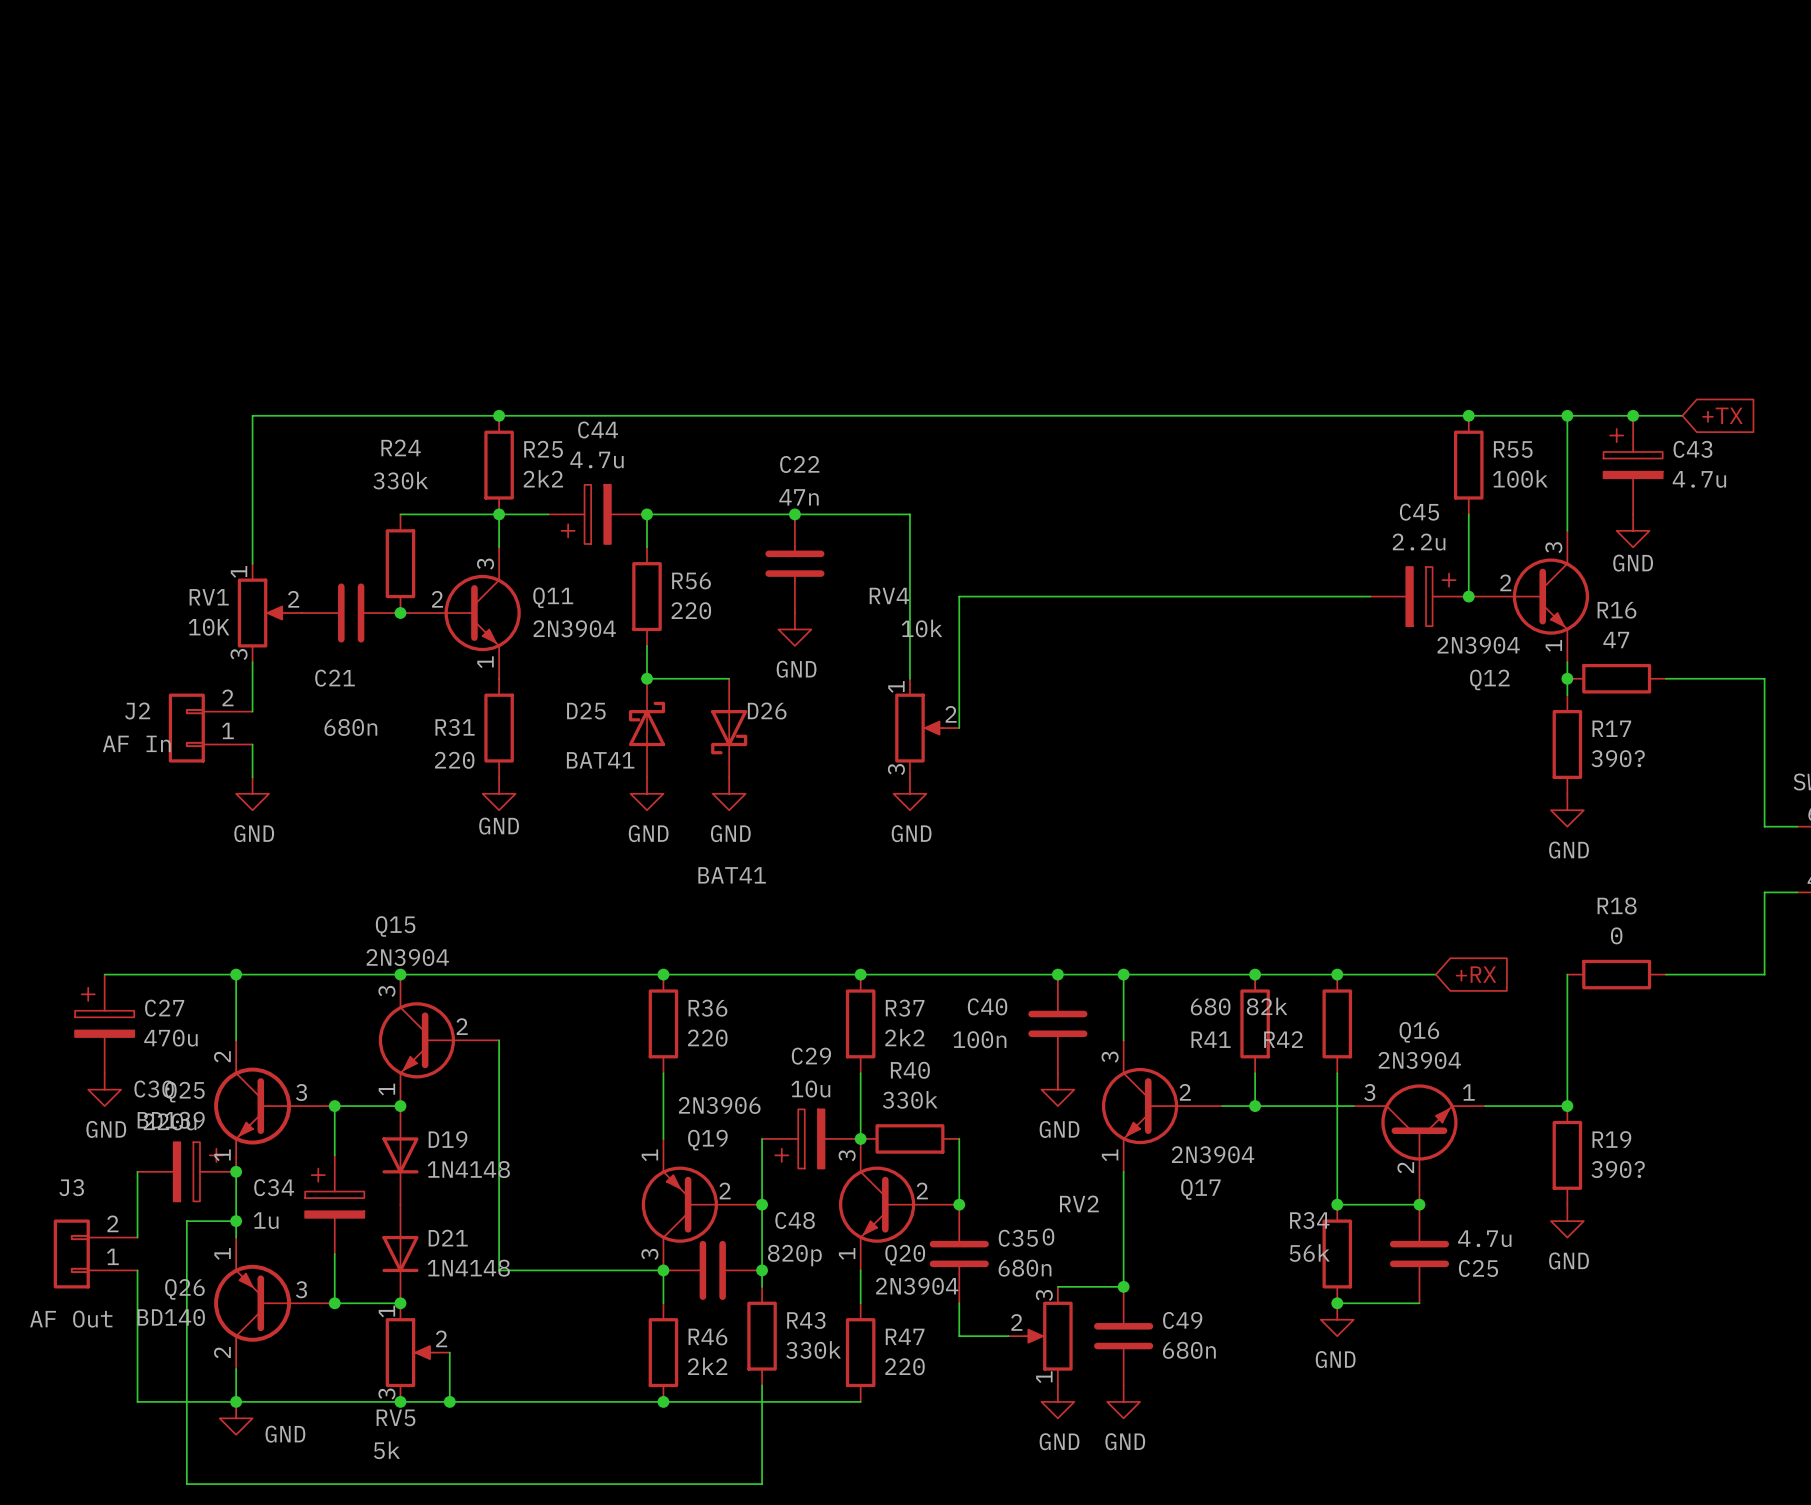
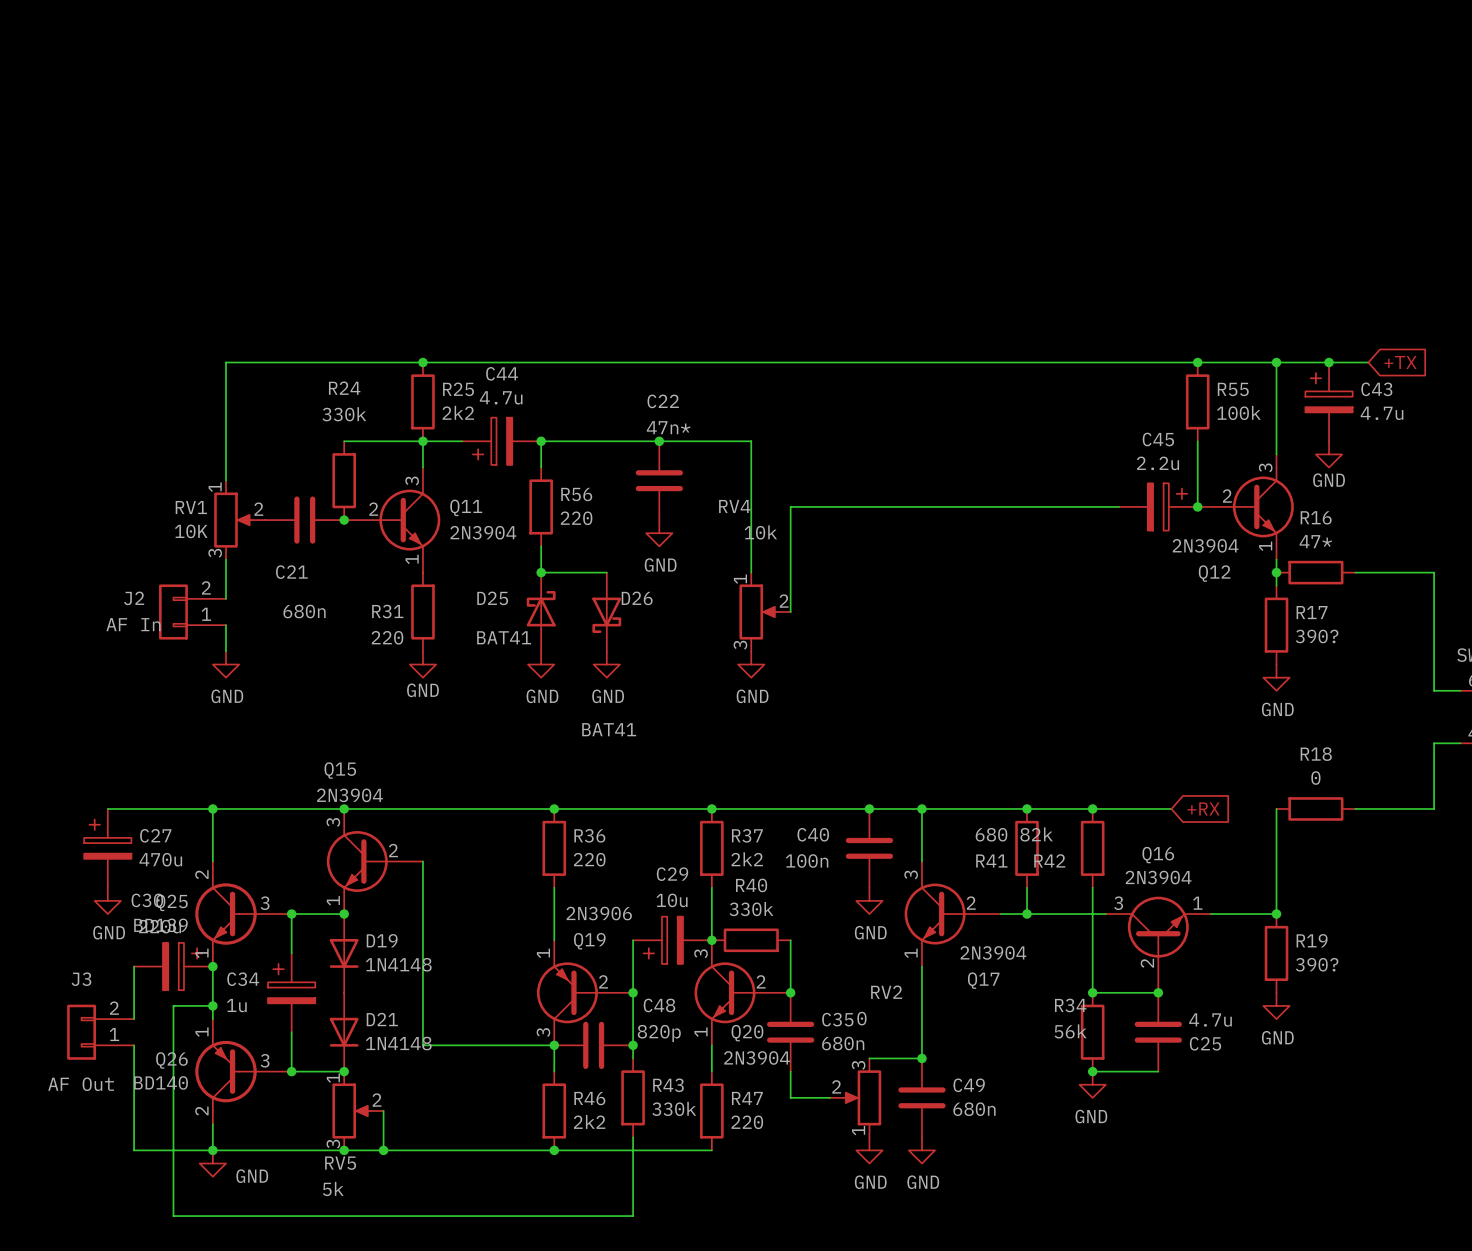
C22 value: 47n (799, 497) -> 47n* (668, 427)
R16 value: 47 (1616, 640) -> 47* (1315, 541)

